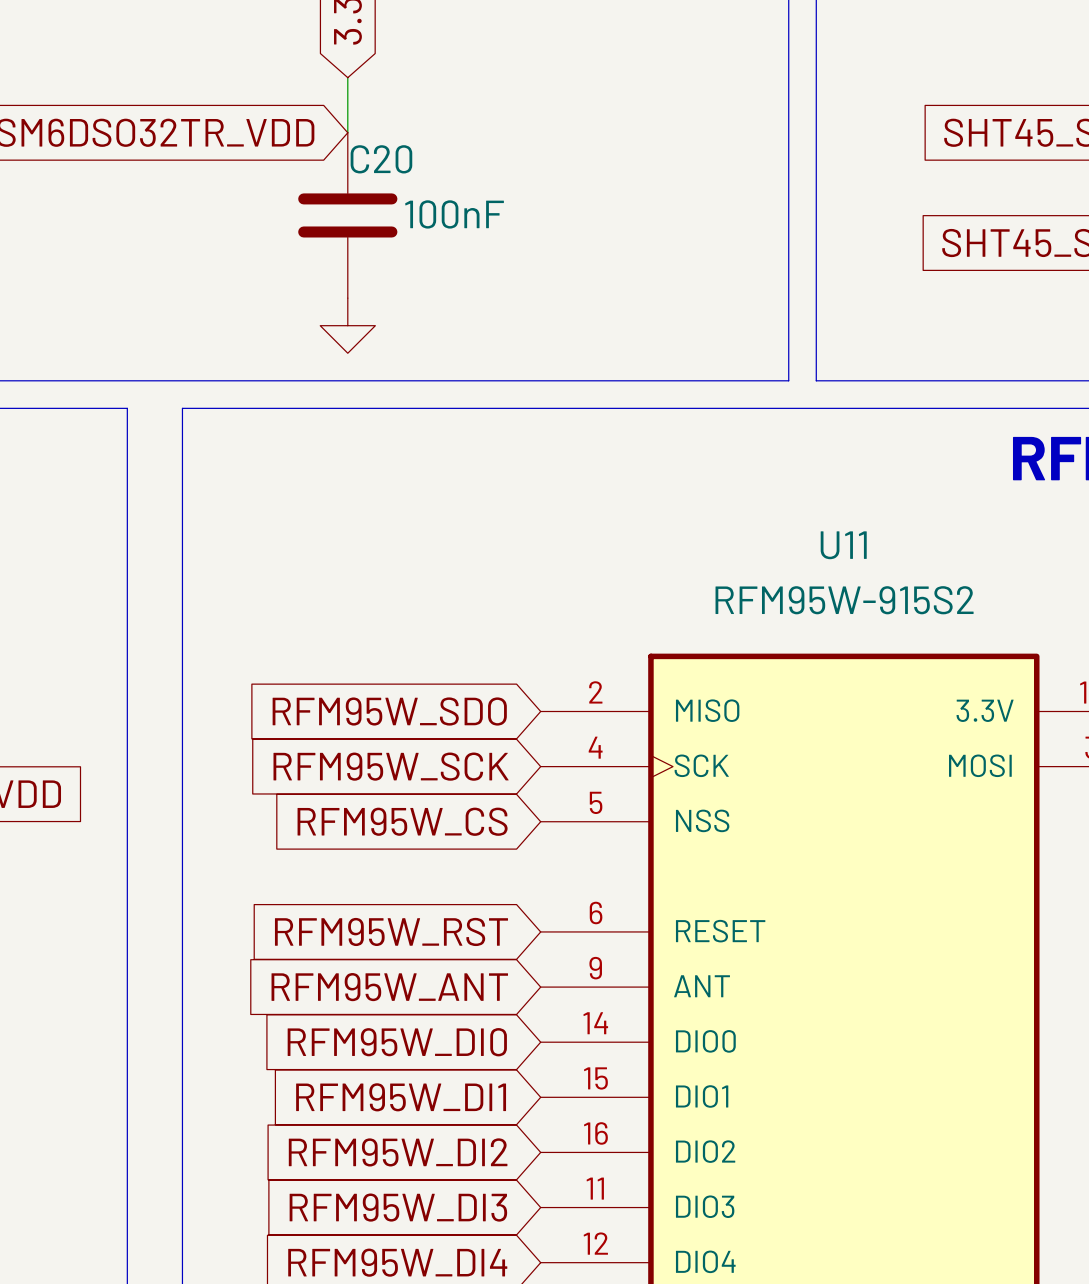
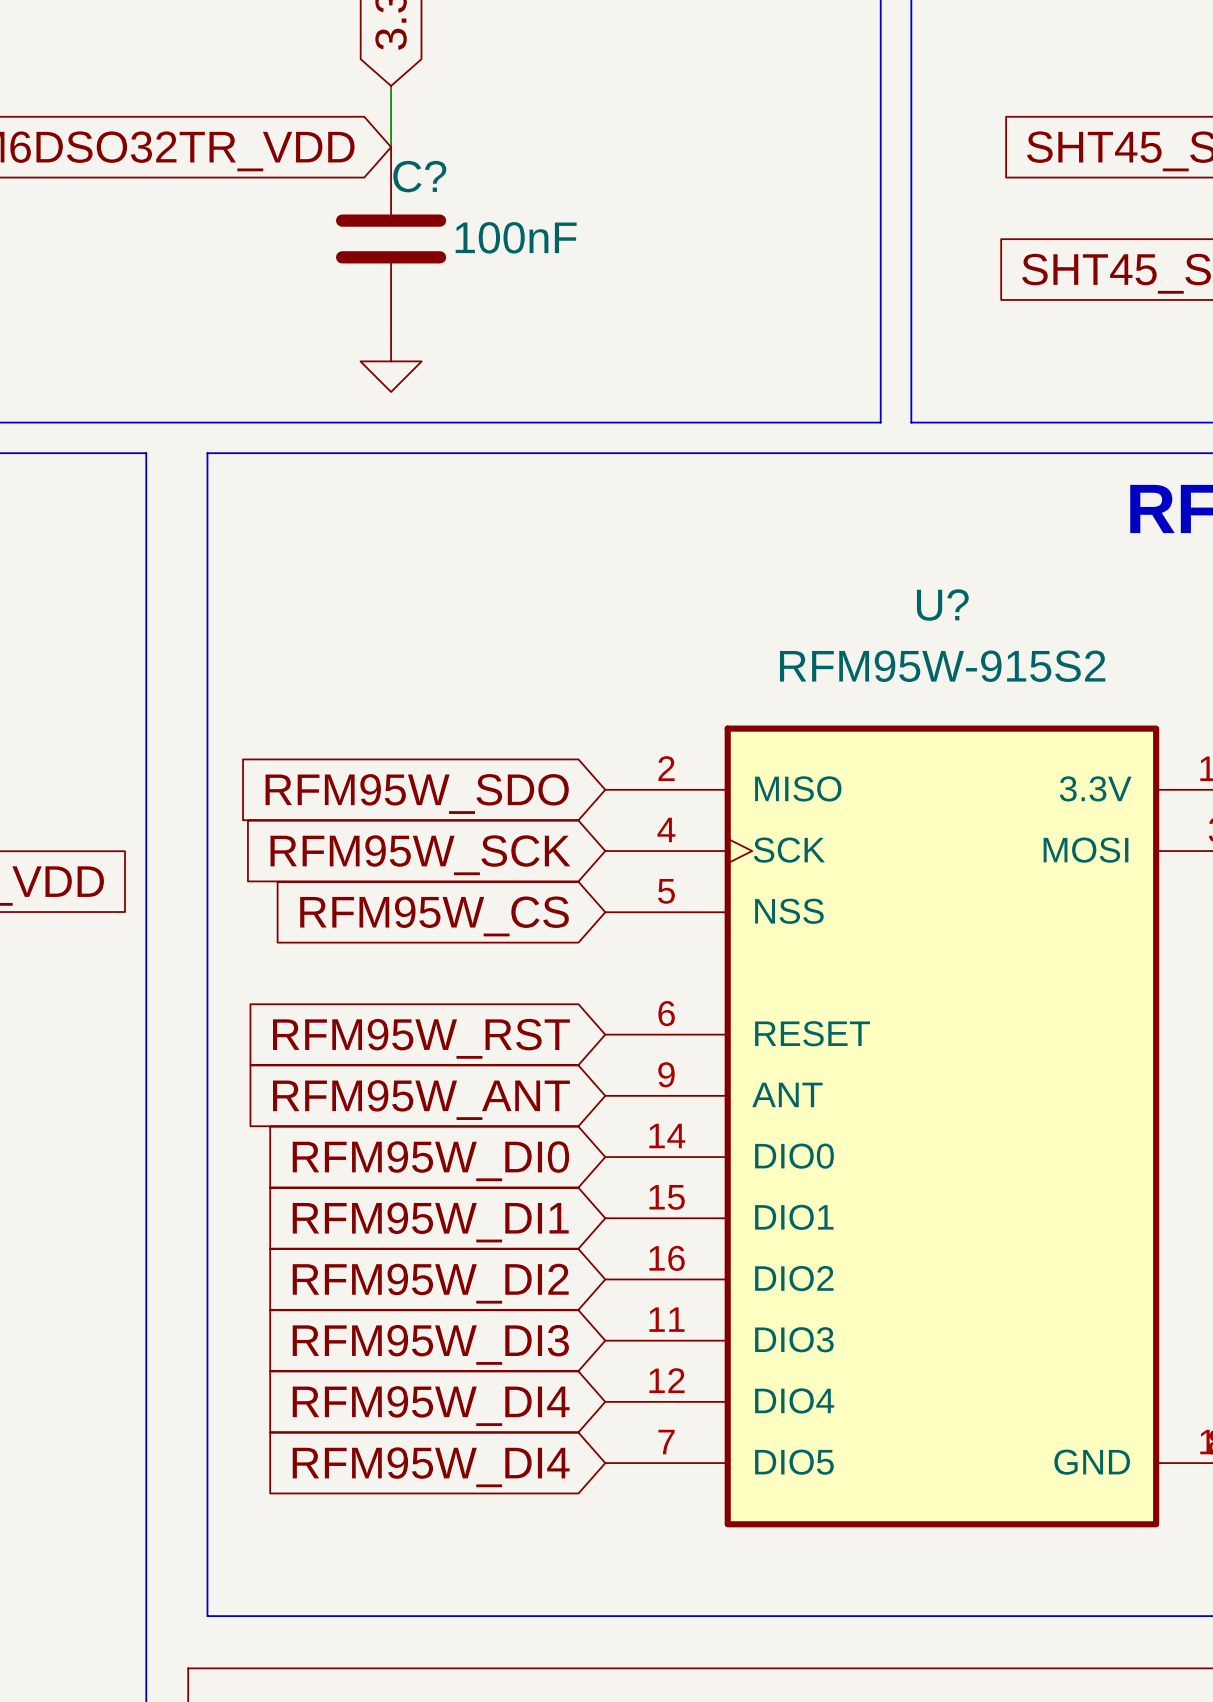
C20 name: C20 (381, 159) -> C? (419, 176)
U11 name: U11 (843, 545) -> U? (942, 605)

